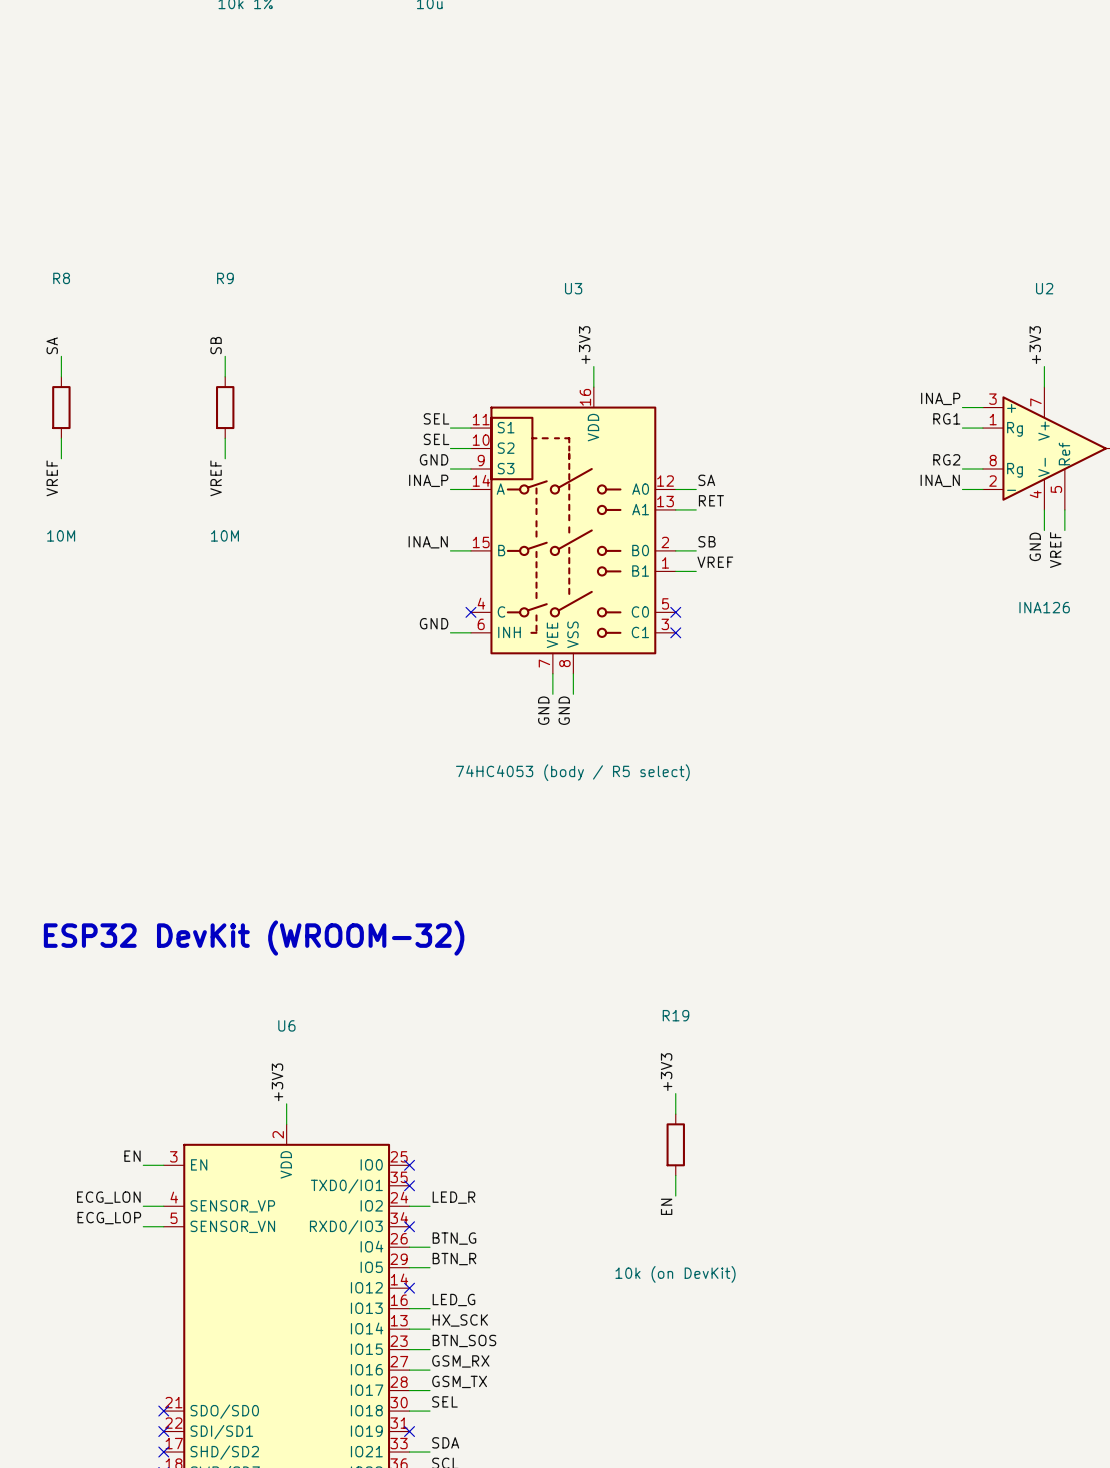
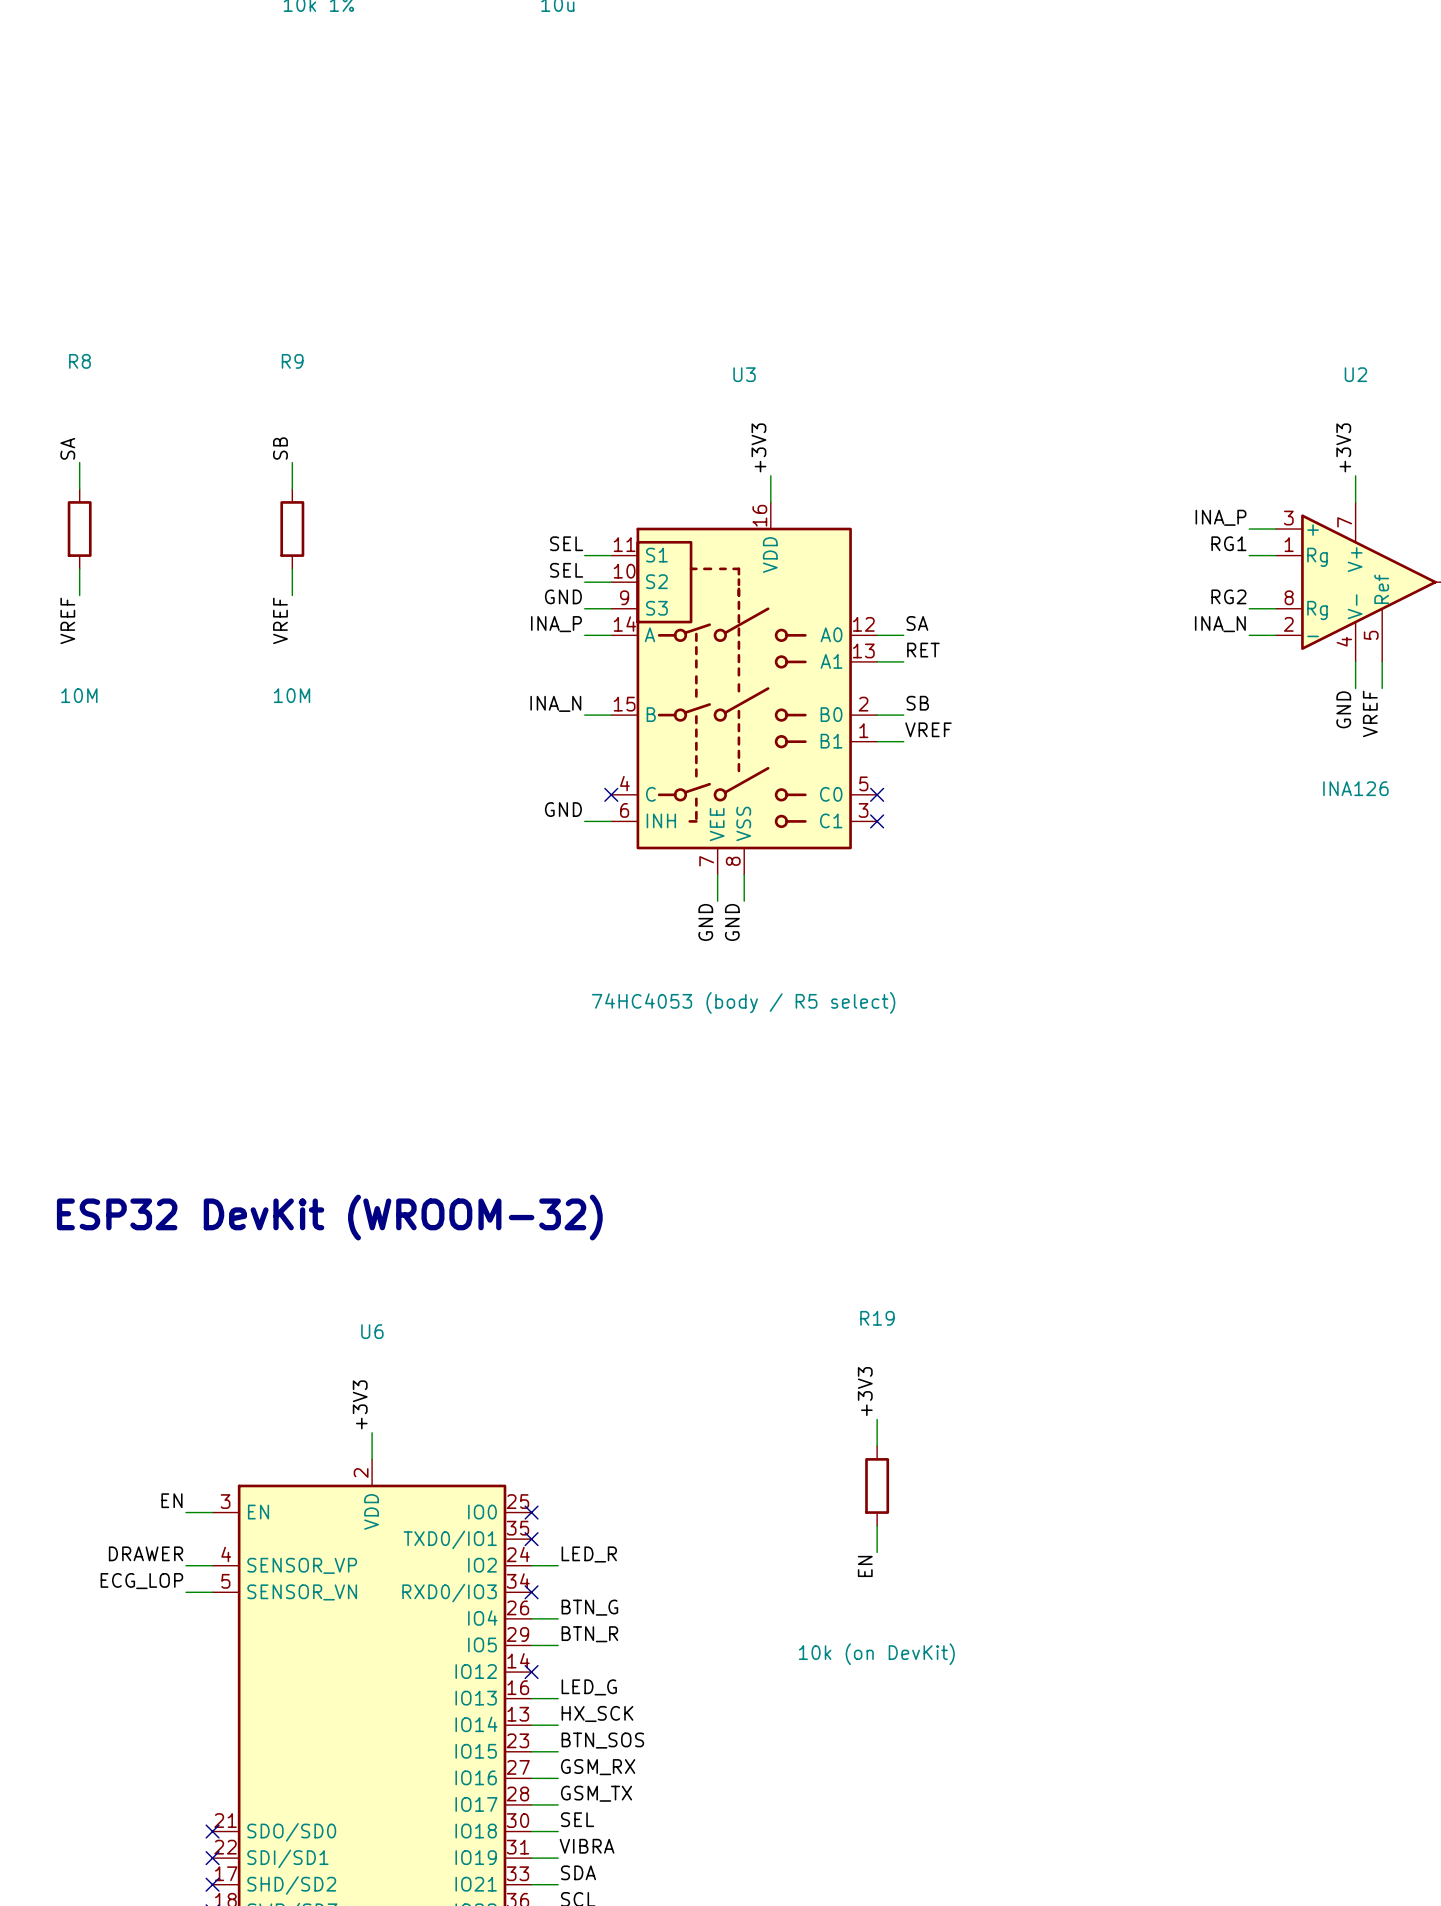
label: ECG_LON (108, 1197) -> DRAWER (146, 1553)
label: none -> VIBRA (587, 1846)
wire: none -> (531, 1858) (558, 1858)
no-connect mark: (409, 1431) -> none

